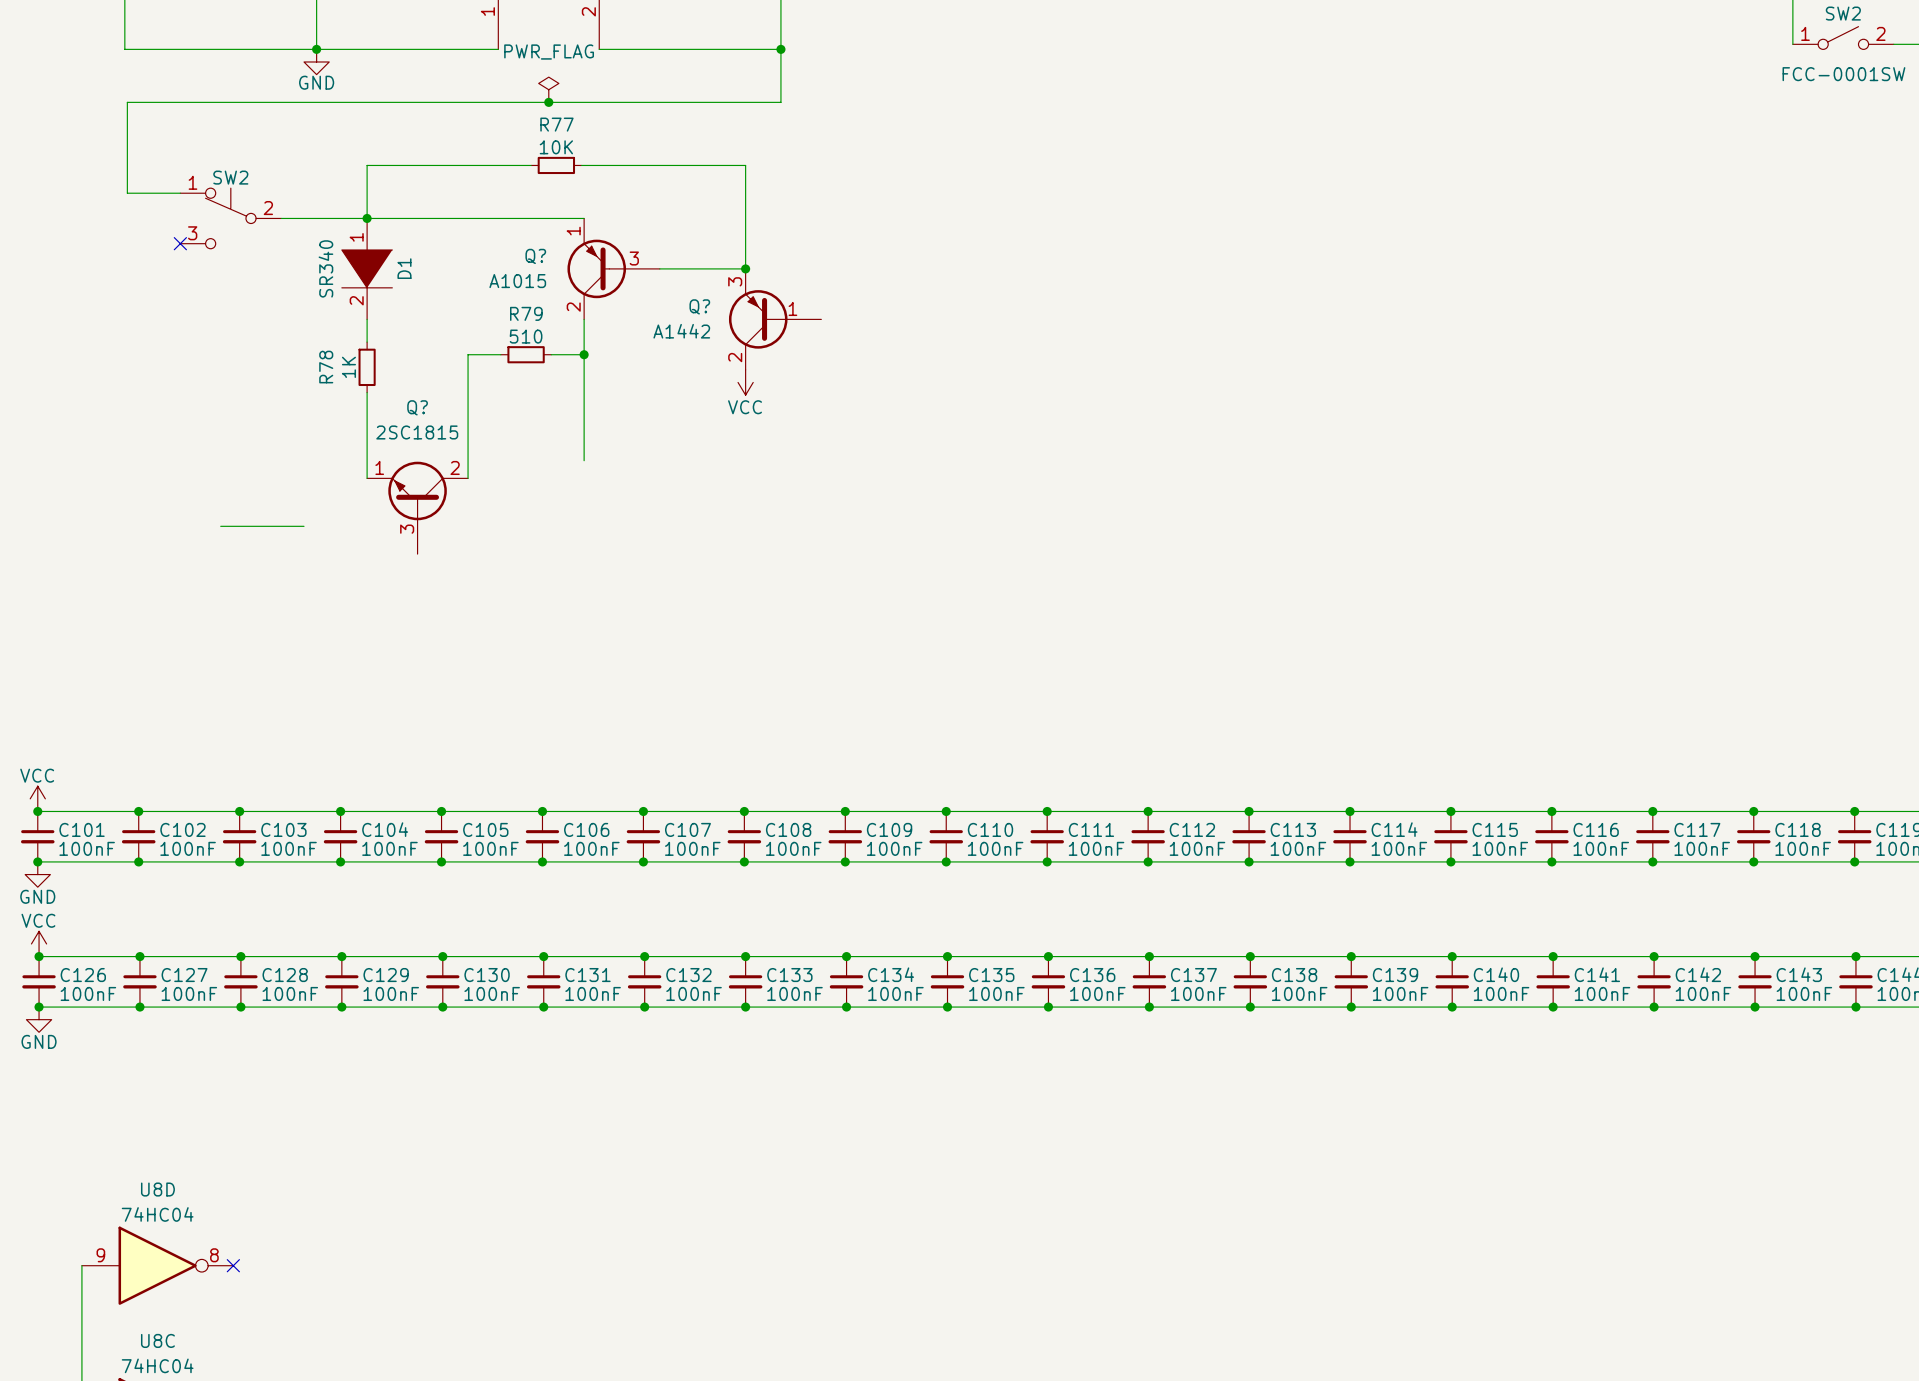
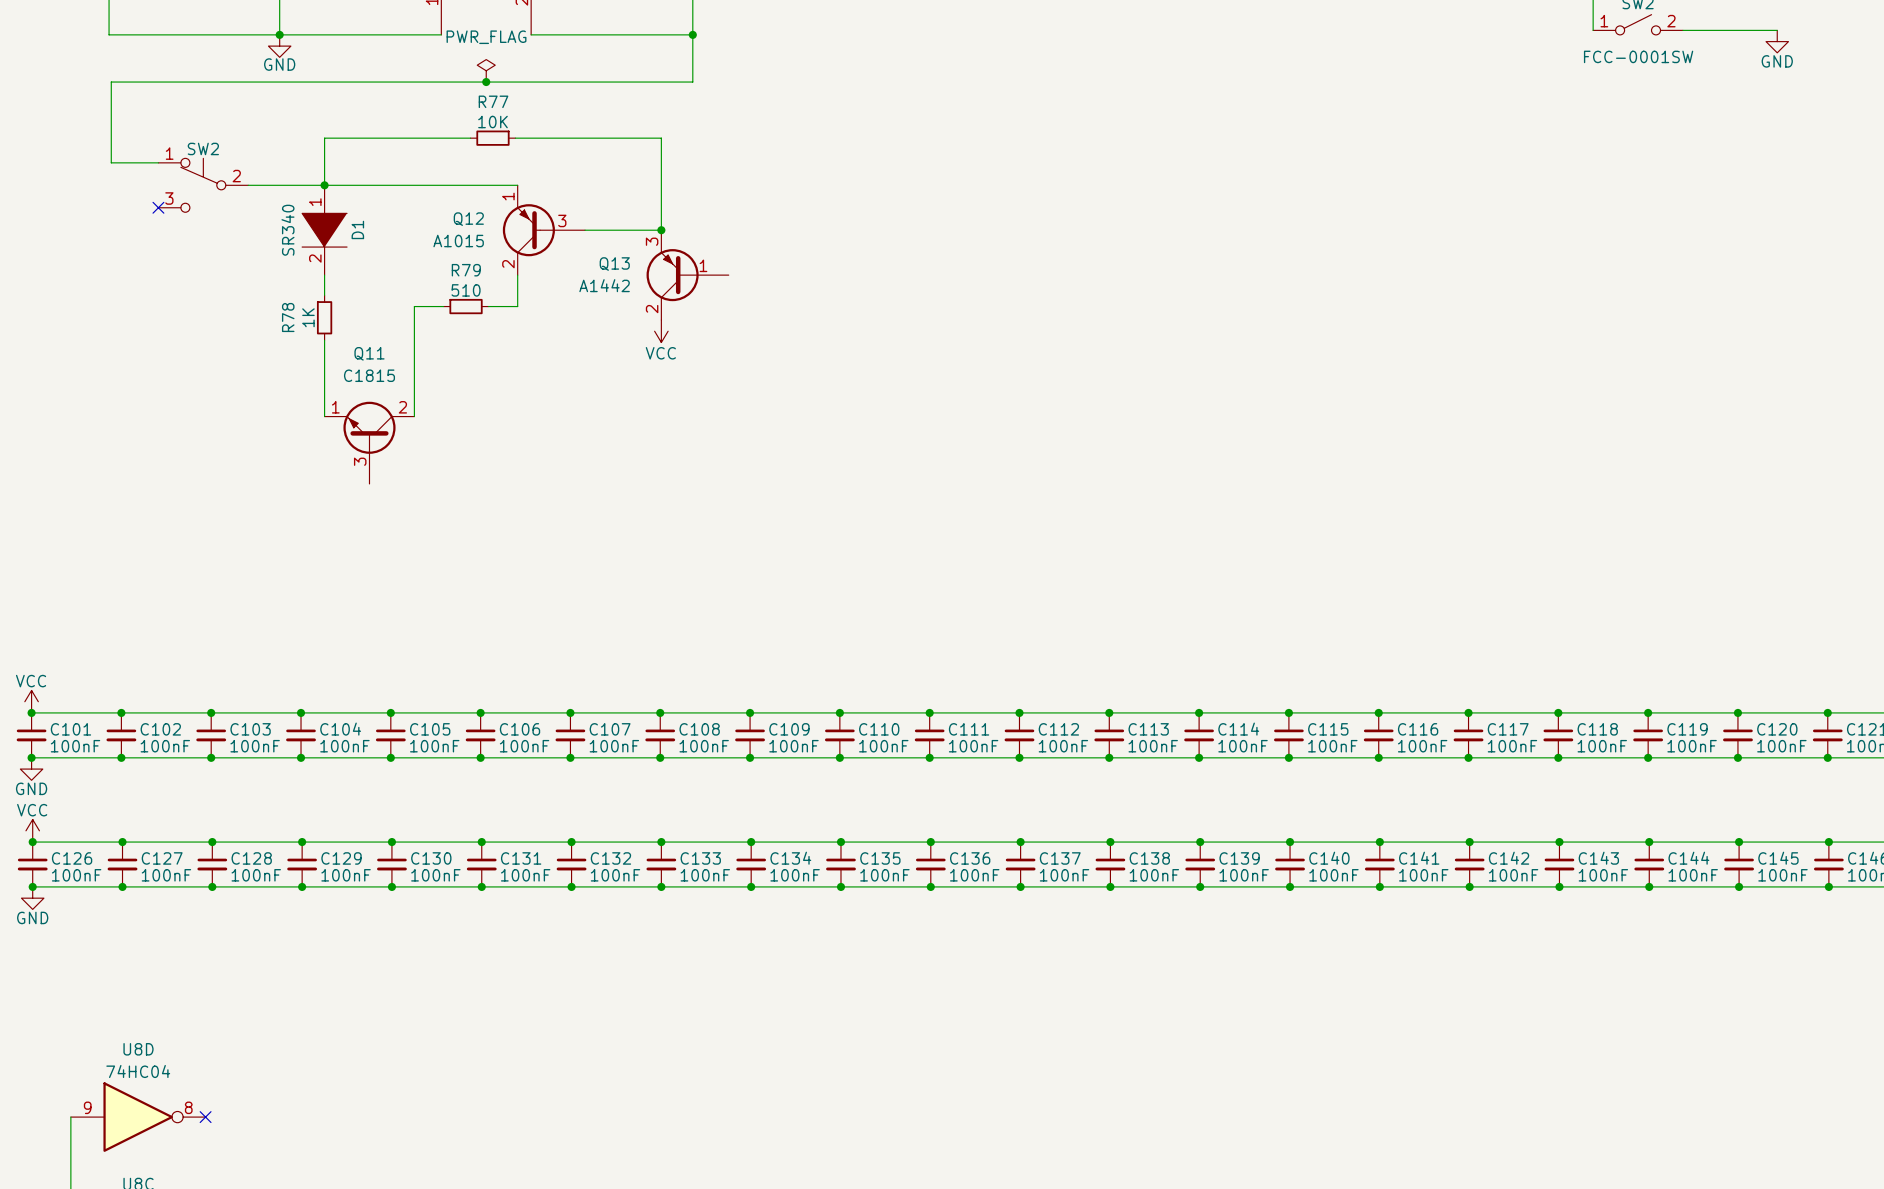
Q? name: Q? (535, 256) -> Q12 (468, 219)
Q? name: Q? (699, 306) -> Q13 (614, 264)
wire: (584, 354) (584, 460) -> none
junction: (584, 354) -> none
Q? name: Q? (417, 407) -> Q11 (369, 353)
Q? value: 2SC1815 (417, 432) -> C1815 (369, 375)
wire: (220, 526) (304, 526) -> none

